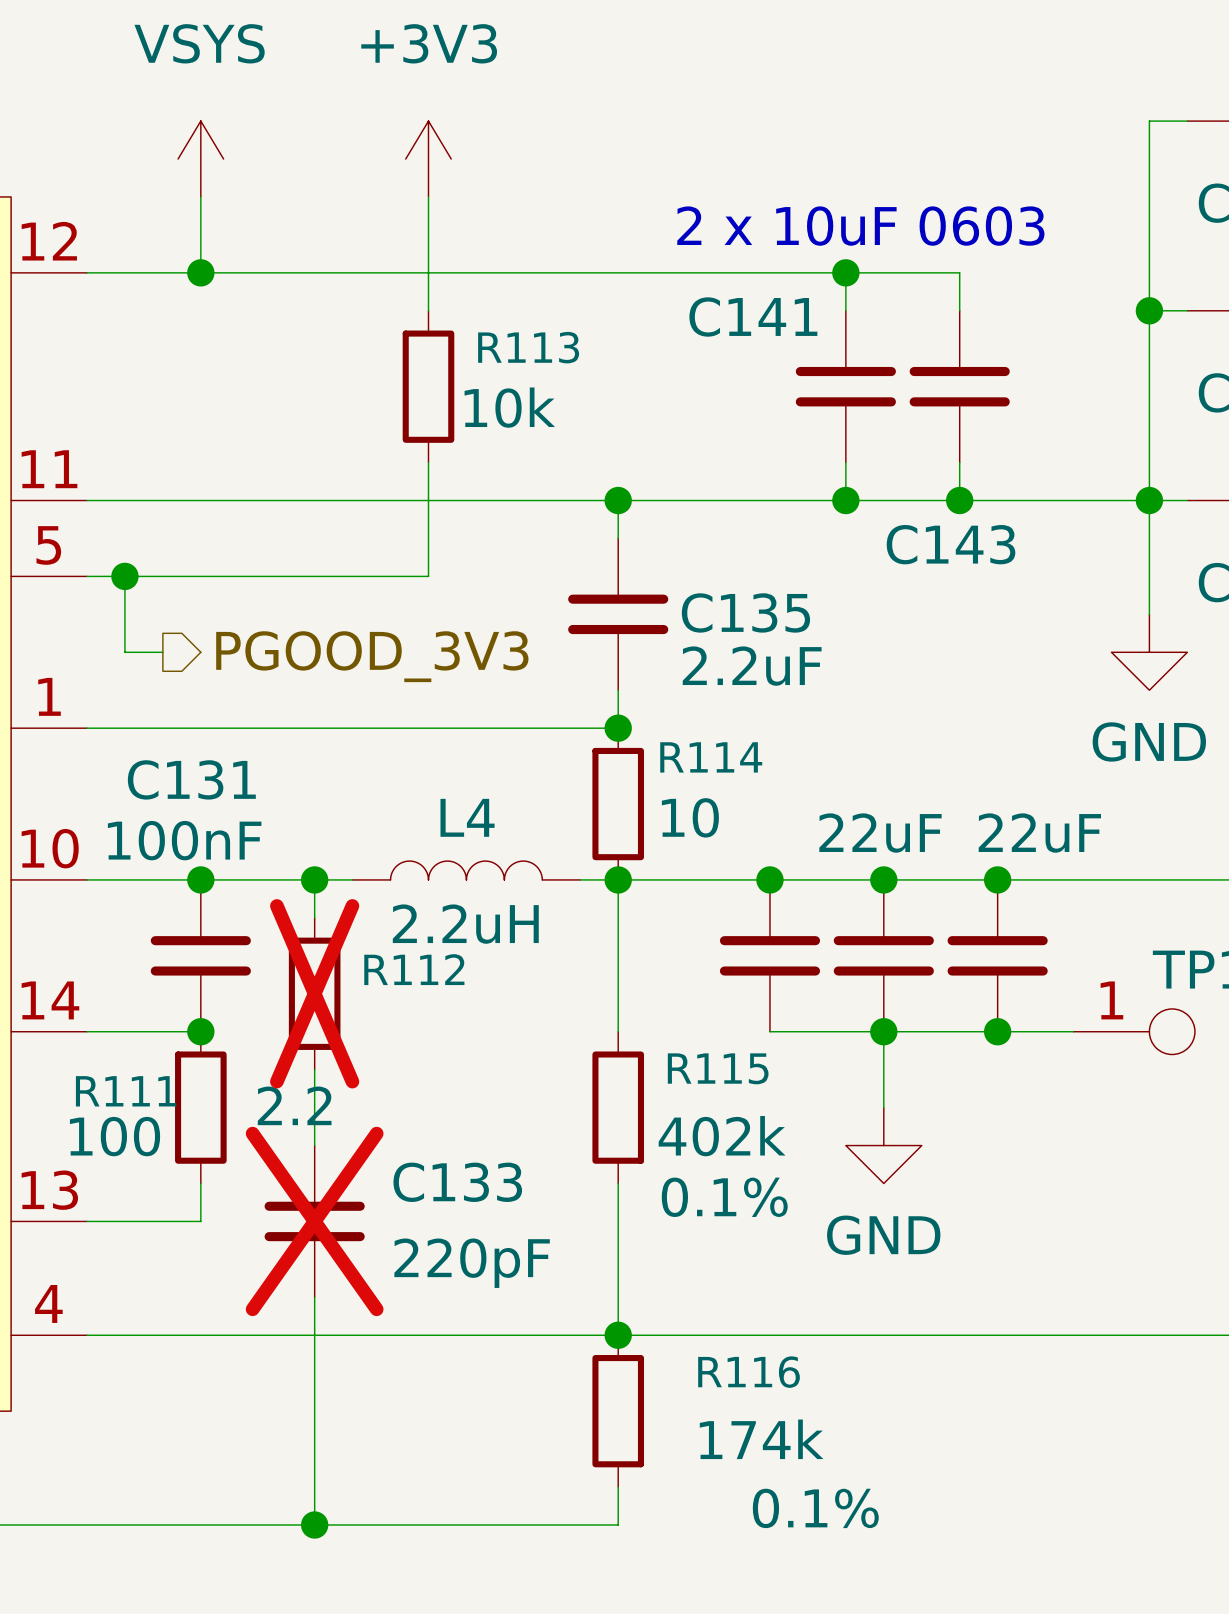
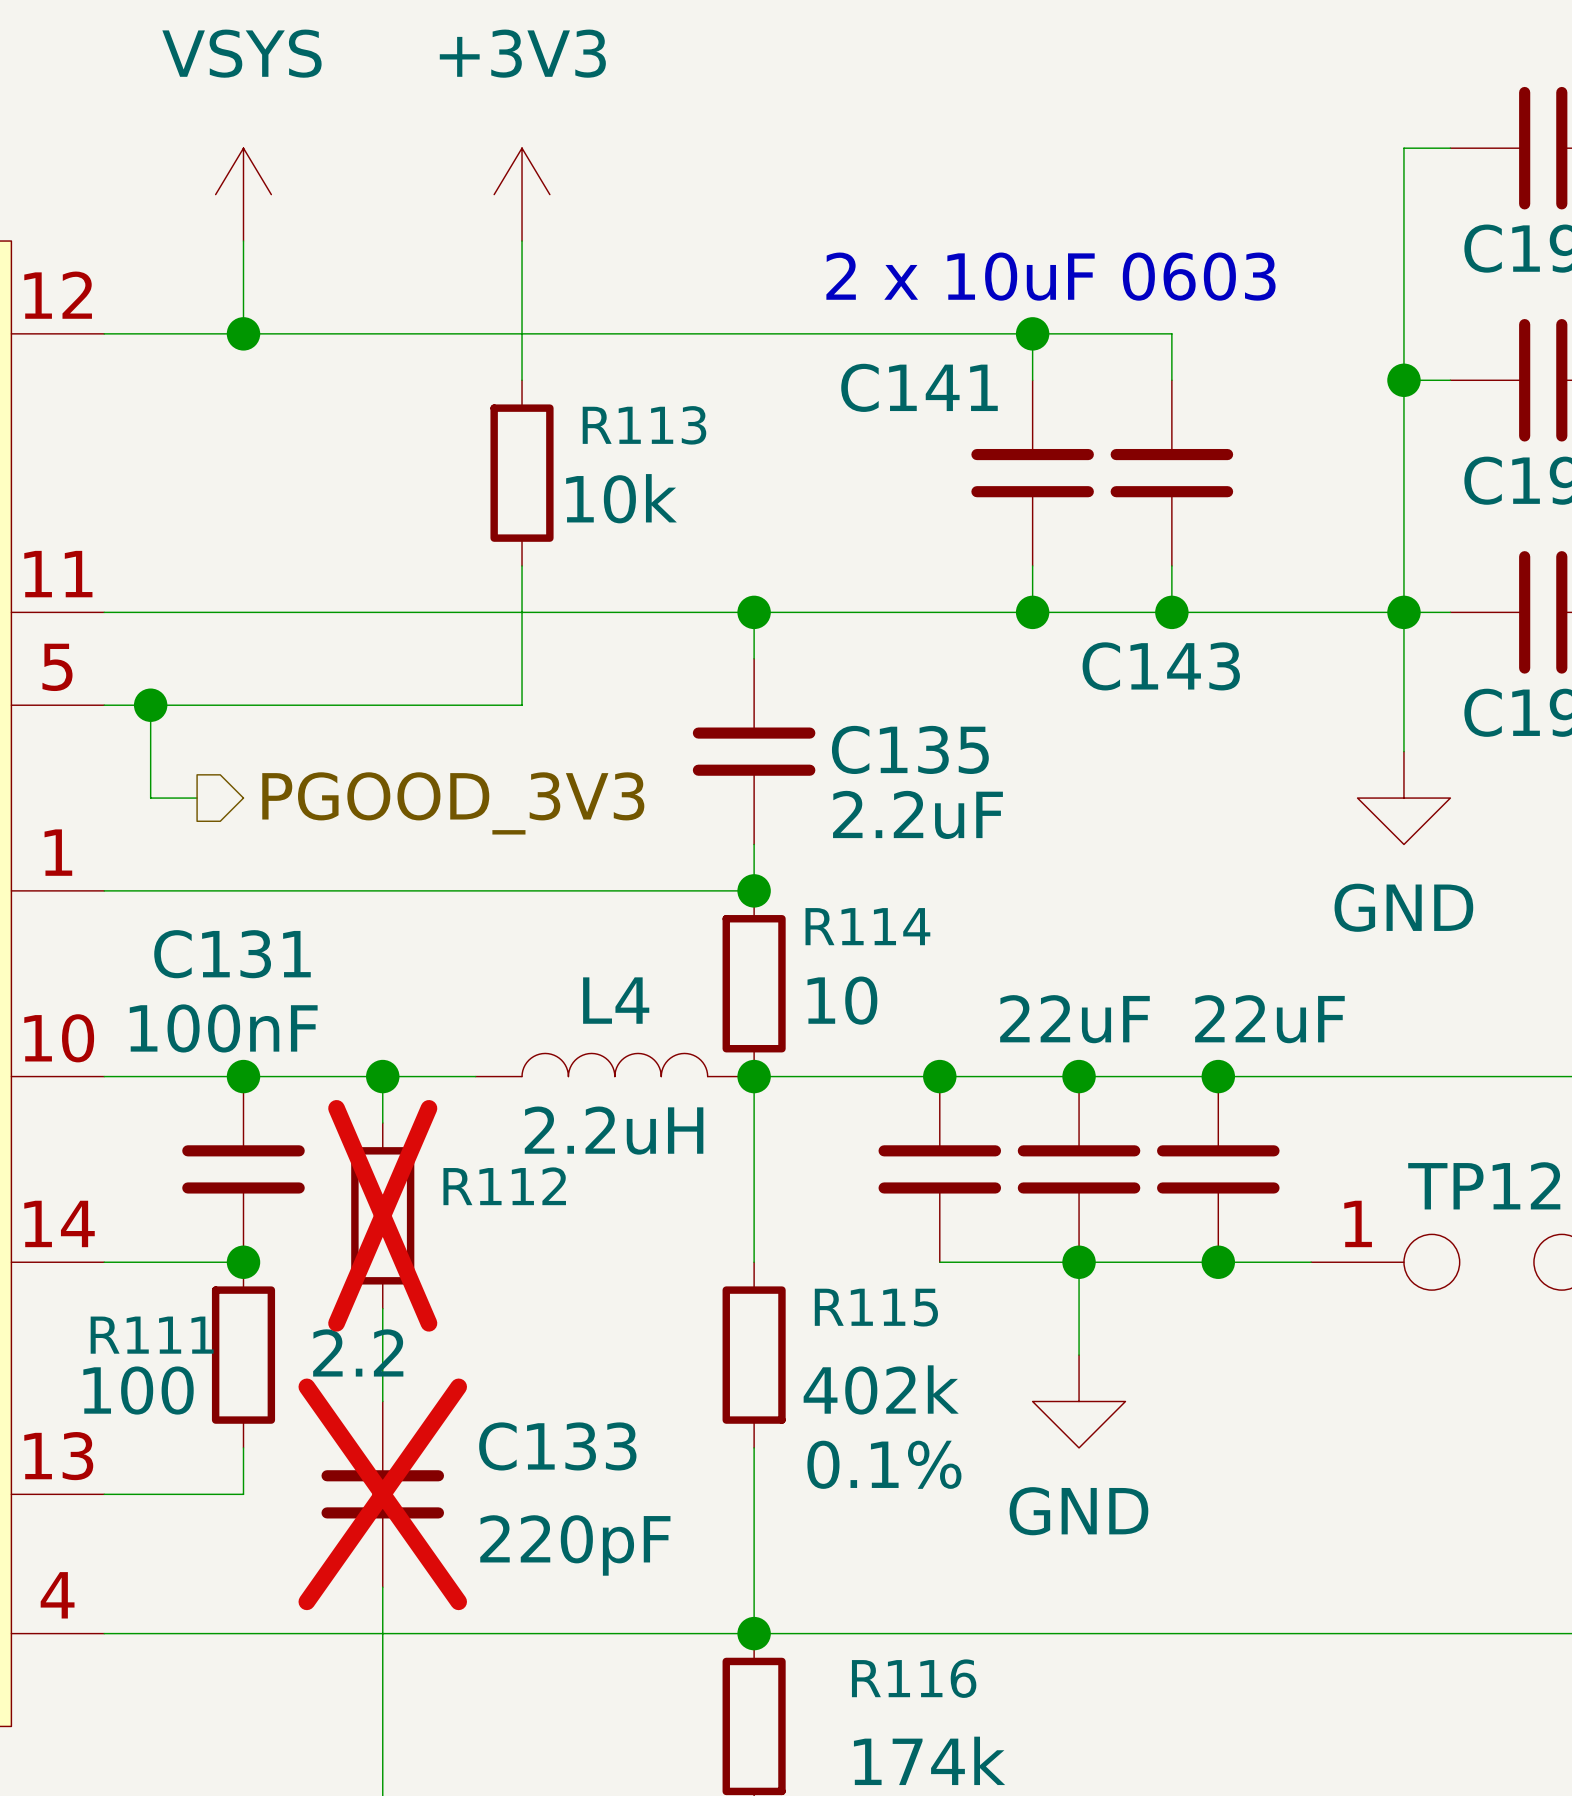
L4 position: (466, 870) -> (614, 1065)

